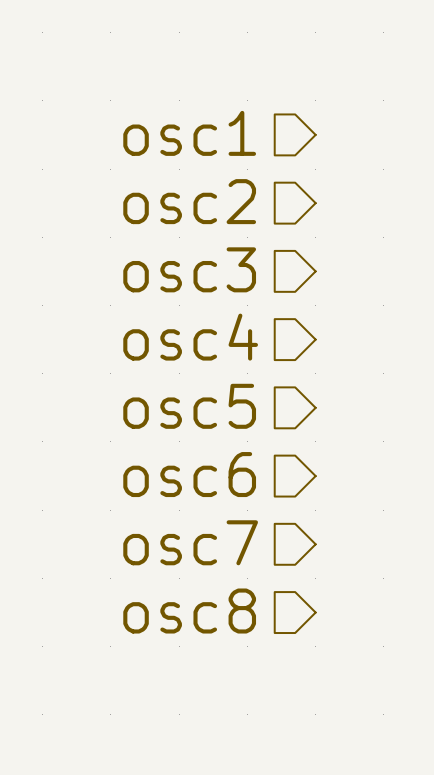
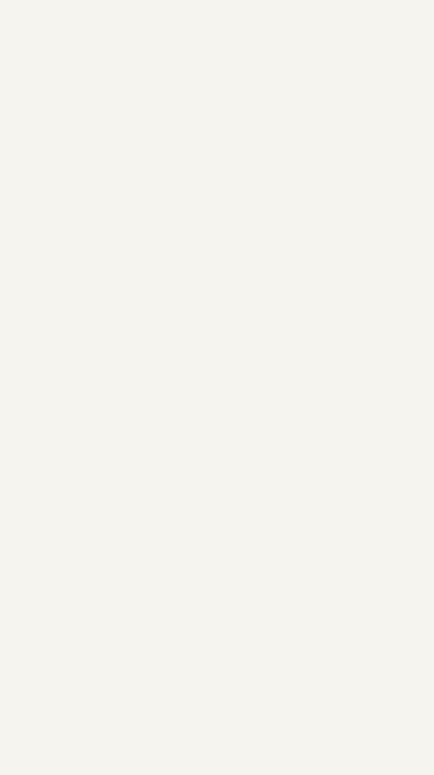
hierarchical label: osc1 (189, 133) -> none
hierarchical label: osc2 (189, 201) -> none
hierarchical label: osc3 (189, 269) -> none
hierarchical label: osc4 (190, 337) -> none
hierarchical label: osc5 (189, 406) -> none
hierarchical label: osc6 (189, 474) -> none
hierarchical label: osc7 (190, 542) -> none
hierarchical label: osc8 (189, 611) -> none

